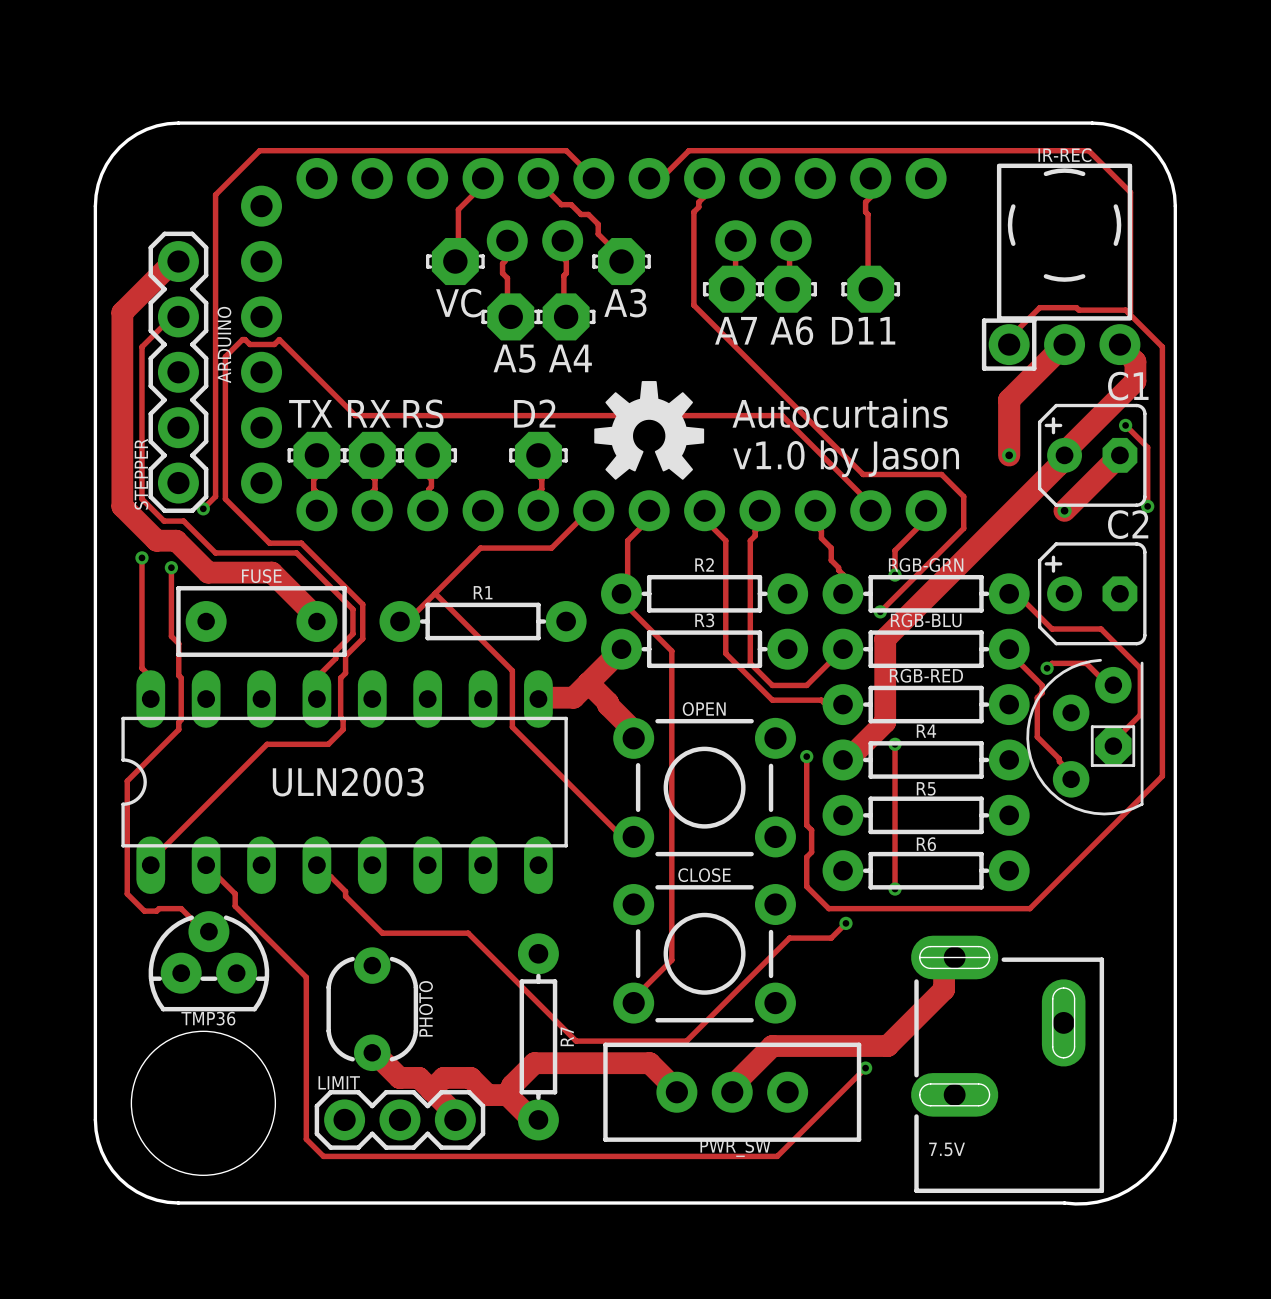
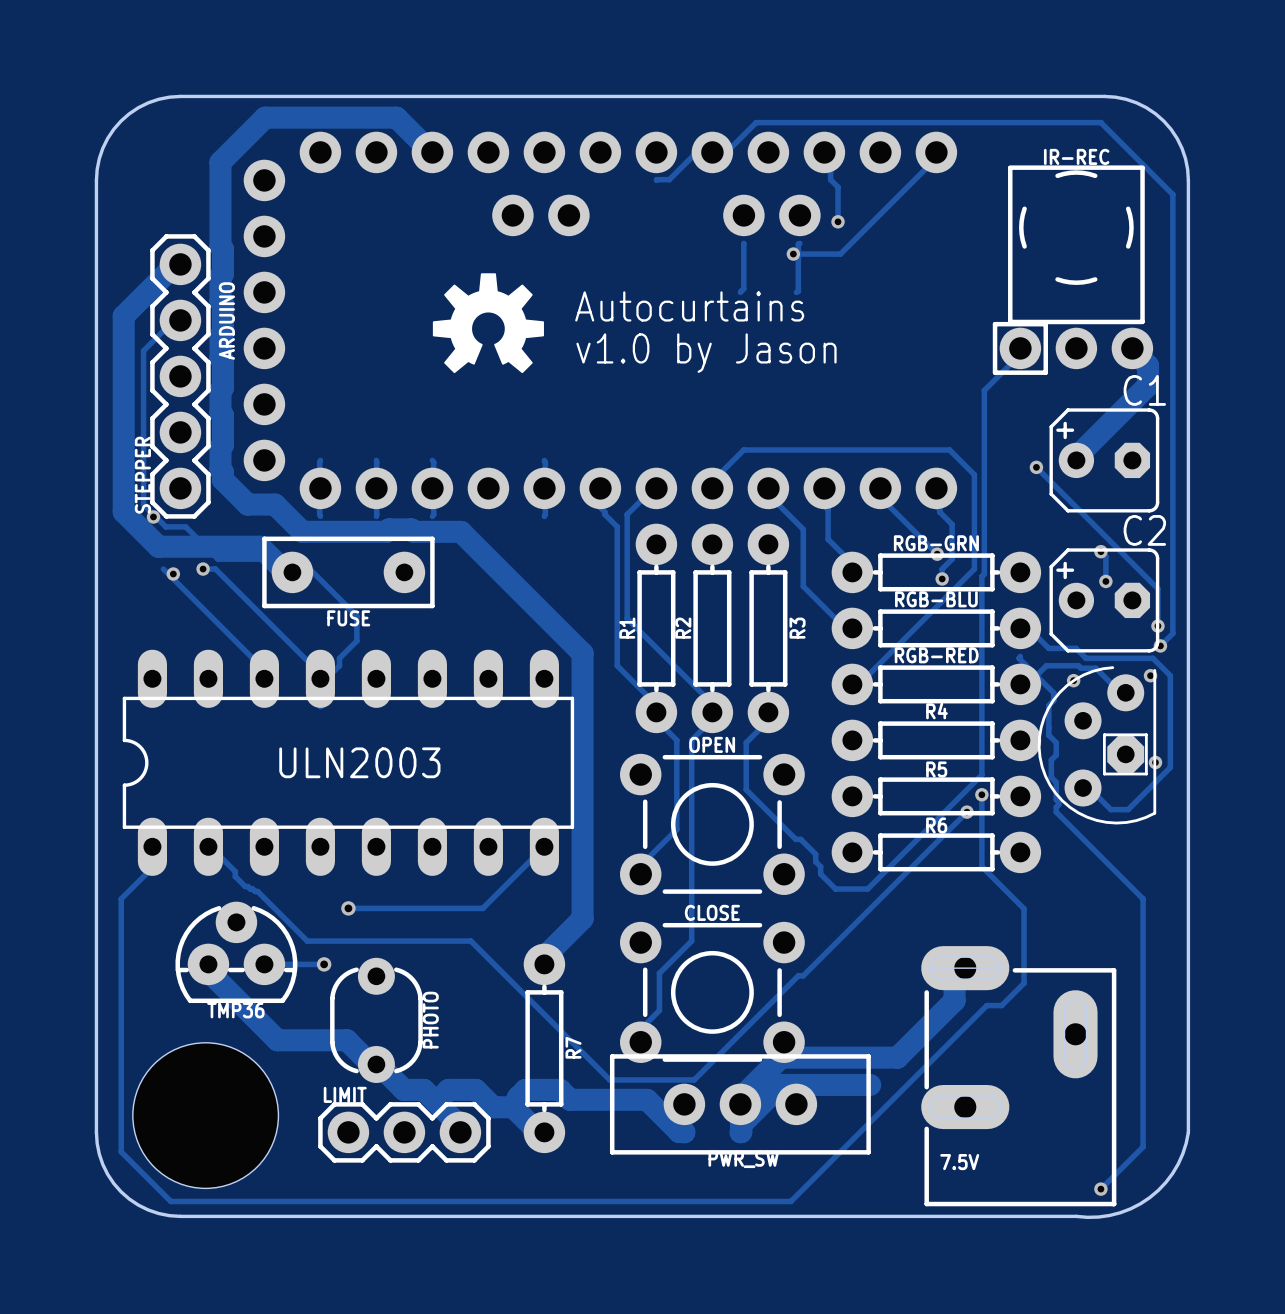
track: none -> (432, 152) (396, 117) (265, 117) (220, 162) (220, 246) (222, 249) (222, 273) (220, 276) (220, 301) (222, 303) (222, 333) (220, 335) (220, 358) (222, 360) (222, 388) (220, 390) (222, 445) (220, 447) (220, 469) (222, 472) (222, 479) (247, 504) (275, 504) (302, 531) (386, 531) (389, 529) (411, 529) (413, 531) (461, 531) (582, 653) (582, 918) (545, 955) (544, 964)
track: (718, 150) (1088, 150) (1130, 192) (1129, 313) -> (726, 152) (756, 122) (1100, 122) (1172, 194) (1172, 633) (1160, 645)
track: none -> (824, 152) (825, 167) (830, 172) (830, 179) (838, 187) (838, 221)
track: none -> (936, 152) (934, 159) (840, 254) (793, 254)
track: (483, 178) (482, 185) (458, 209) (458, 258) (455, 261) -> none
track: (538, 178) (561, 204) (571, 204) (581, 214) (588, 214) (598, 224) (598, 234) (620, 256) (621, 261) -> none
track: (593, 178) (566, 150) (259, 150) (215, 194) (215, 496) (203, 508) -> none
track: (704, 178) (703, 197) (693, 212) (693, 305) (863, 474) (941, 474) (963, 496) -> (712, 488) (714, 479) (743, 450) (949, 450) (974, 474) (974, 502)
track: (870, 178) (870, 197) (865, 202) (865, 212) (868, 214) (868, 285) (870, 289) -> none
board edge: (95, 206) (101, 174) (119, 147) (146, 129) (178, 123) (1103, 123) (1133, 134) (1150, 147) (1168, 174) (1175, 206) -> (96, 208) (96, 180) (99, 158) (113, 129) (138, 107) (158, 99) (180, 96) (1115, 97) (1146, 107) (1163, 121) (1177, 138) (1187, 169) (1188, 208)
via: none -> (838, 221)
track: (507, 240) (505, 241) (505, 261) (502, 263) (502, 273) (507, 278) (507, 312) (510, 316) -> none
track: (562, 240) (563, 258) (566, 261) (566, 273) (563, 275) (563, 315) (566, 316) -> none
via: none -> (793, 254)
VC: (455, 261) -> none
A3: (621, 261) -> none
A7: (732, 289) -> none
A6: (787, 289) -> none
D11: (870, 289) -> none
A5: (510, 316) -> none
A4: (566, 316) -> none
ARDUINO position: (593, 344) -> (600, 320)
track: (1009, 344) (1010, 337) (1039, 307) (1076, 307) (1079, 310) (1125, 310) (1162, 346) (1162, 776) (1029, 908) (828, 908) (806, 886) (806, 857) (811, 852) (811, 830) (806, 825) (806, 756) -> (1020, 348) (1019, 355) (984, 390) (981, 774) (867, 889) (835, 889) (820, 874) (820, 866) (815, 861) (815, 854) (800, 839) (795, 839) (746, 789) (746, 742) (766, 722) (766, 712) (768, 712)
track: (1064, 344) (1009, 399) (1009, 455) -> none
text position: Autocurtains (840, 413) -> Autocurtains (689, 306)
track: (1125, 425) (1147, 447) (1147, 506) -> none
via: (1125, 425) -> none
drawing position: (649, 430) -> (488, 323)
TX: (316, 455) -> none
RX: (372, 455) -> none
RS: (427, 455) -> none
D2: (538, 455) -> none
via: (1009, 455) -> none
track: (1064, 455) (1059, 464) (885, 638) (885, 722) (848, 759) (843, 759) -> none
track: (1119, 455) (1064, 510) -> none
text position: v1.0 by Jason (846, 458) -> v1.0 by Jason (706, 353)
track: none -> (1036, 467) (1157, 588) (1157, 626)
via: none -> (1036, 467)
track: none -> (600, 488) (599, 507) (617, 526) (617, 665) (654, 702) (656, 720) (676, 740) (676, 829) (642, 864) (640, 874)
track: none -> (656, 488) (627, 514) (627, 618) (711, 702) (712, 712) (711, 720) (691, 740) (691, 941) (659, 973) (659, 1010) (642, 1027) (640, 1042)
track: none -> (768, 488) (768, 494) (803, 529) (803, 586) (842, 626) (850, 626) (852, 628)
track: none -> (824, 488) (825, 507) (828, 509) (828, 539) (850, 561) (850, 571) (852, 572)
track: none -> (880, 488) (882, 489) (882, 499) (937, 554)
track: none -> (936, 488) (937, 507) (952, 524) (952, 559) (942, 569) (942, 578)
via: (1147, 506) -> none
via: (203, 508) -> none
track: (593, 510) (588, 511) (551, 548) (480, 548) (409, 619) (401, 619) (399, 621) -> none
track: (649, 510) (647, 511) (647, 521) (627, 540) (627, 587) (621, 593) (622, 602) (671, 651) (671, 960) (635, 996) (633, 1003) -> none
track: (704, 510) (706, 521) (725, 540) (725, 653) (772, 700) (821, 700) (823, 702) (841, 702) (843, 704) -> none
track: (759, 510) (757, 511) (757, 528) (755, 530) (755, 535) (750, 540) (750, 663) (772, 685) (806, 685) (843, 649) -> none
track: (815, 510) (816, 526) (821, 530) (821, 538) (831, 548) (831, 560) (843, 575) (843, 593) -> none
track: (870, 510) (870, 503) (782, 415) (355, 415) (279, 339) (274, 344) (249, 344) (242, 339) (225, 356) (225, 499) (269, 543) (301, 543) (362, 604) (362, 638) (345, 656) (345, 673) (340, 678) (340, 717) (343, 719) (343, 729) (328, 744) (267, 744) (151, 859) (150, 865) -> none
track: (926, 510) (924, 511) (924, 521) (895, 550) (895, 575) -> none
via: (1064, 510) -> none
via: none -> (153, 516)
track: (963, 528) (880, 611) -> (974, 534) (974, 569) (860, 683) (852, 684)
track: (176, 540) (208, 572) (271, 572) (311, 611) (316, 621) -> (178, 546) (260, 546) (284, 571) (292, 572)
track: none -> (1100, 551) (1105, 556) (1105, 581)
via: none -> (1100, 551)
via: none -> (937, 554)
track: (141, 557) (141, 668) (149, 675) (150, 699) -> none
via: (141, 557) -> none
track: none -> (163, 569) (262, 668) (262, 678) (264, 678)
track: none -> (203, 569) (215, 569) (319, 673) (320, 678)
via: none -> (203, 569)
track: (171, 567) (171, 636) (178, 643) (181, 719) (178, 722) (178, 729) (127, 781) (127, 893) (144, 911) (181, 908) (203, 930) (208, 931) -> none
via: none -> (942, 578)
via: (895, 575) -> none
via: none -> (1105, 581)
FUSE name position: FUSE (261, 576) -> FUSE (348, 618)
track: (435, 593) (512, 670) (512, 727) (620, 835) (632, 835) (633, 836) -> none
R2 rotation: 0° (704, 593) -> 90° clockwise (712, 628)
RGB-GRN position: (926, 593) -> (936, 572)
track: (1009, 593) (1017, 594) (1052, 629) (1101, 629) (1140, 668) (1140, 714) (1115, 739) (1115, 744) (1113, 746) -> none
via: (880, 611) -> none
via: none -> (1157, 626)
FUSE position: (261, 621) -> (348, 572)
R1 rotation: 0° (483, 621) -> 90° clockwise (656, 628)
R1 position: (483, 621) -> (656, 628)
via: none -> (1160, 645)
track: (621, 649) (573, 697) (538, 699) -> none
R3 rotation: 0° (704, 649) -> 90° clockwise (768, 628)
RGB-BLU position: (926, 649) -> (936, 628)
track: (1086, 663) (1052, 663) (1047, 668) -> (1098, 670) (1095, 668) (1081, 668) (1078, 665) (1046, 665) (1028, 683) (1020, 684)
via position: (1047, 668) -> (1073, 680)
via: none -> (1150, 675)
track: (588, 682) (632, 729) (633, 738) -> none
RGB-RED position: (926, 704) -> (936, 684)
track: (1037, 727) (1037, 736) (1069, 771) (1069, 778) (1071, 779) -> (1020, 628) (1028, 628) (1048, 648) (1076, 648) (1086, 658) (1153, 658) (1170, 675) (1170, 767) (1128, 809) (1110, 809) (1091, 789) (1083, 789) (1083, 788)
track: none -> (1048, 735) (1056, 742) (1056, 755) (1051, 760) (1051, 777) (1056, 782) (1056, 799) (1058, 802) (1056, 812) (1143, 898) (1143, 1146) (1100, 1189)
track: (895, 744) (895, 889) -> none
via: (895, 744) -> none
via: none -> (1155, 762)
via: (806, 756) -> none
R4 position: (926, 759) -> (936, 740)
ULN2003 position: (344, 782) -> (348, 762)
track: none -> (981, 794) (981, 866) (1024, 908) (1024, 983) (1001, 1005) (986, 1005) (790, 1201) (170, 1201) (121, 1151) (121, 898) (151, 869) (152, 846)
via: none -> (981, 794)
OPEN position: (704, 787) -> (712, 824)
via: none -> (966, 812)
R5 position: (926, 815) -> (936, 796)
track: none -> (544, 846) (482, 908) (348, 908)
track: (206, 865) (235, 893) (235, 906) (306, 977) (306, 1139) (323, 1156) (777, 1156) (860, 1073) -> (740, 1132) (741, 1124) (780, 1084) (870, 1084)
track: (316, 865) (345, 891) (345, 896) (382, 933) (468, 933) -> (208, 846) (235, 871) (235, 876) (245, 886) (257, 891) (307, 941) (470, 941) (473, 943)
R6 position: (926, 870) -> (936, 852)
via: (895, 889) -> none
via: none -> (348, 908)
TMP36 footprint: [148, 911, 270, 1012] -> [175, 901, 298, 1004]
track: (845, 923) (831, 938) (789, 938) (686, 1041) (576, 1041) -> (966, 812) (803, 975) (798, 975) (694, 1079) (609, 1079) (582, 1052)
via: (845, 923) -> none
track: none -> (208, 964) (210, 965) (210, 973) (277, 1040) (346, 1040) (366, 1060) (376, 1064)
track: none -> (264, 964) (324, 964)
via: none -> (324, 964)
CLOSE position: (704, 953) -> (712, 992)
via: (865, 1068) -> none
track: (519, 1077) (534, 1063) (649, 1063) (676, 1092) -> (525, 1089) (560, 1089) (570, 1099) (647, 1099) (679, 1132) (684, 1132)
via: none -> (1100, 1189)

